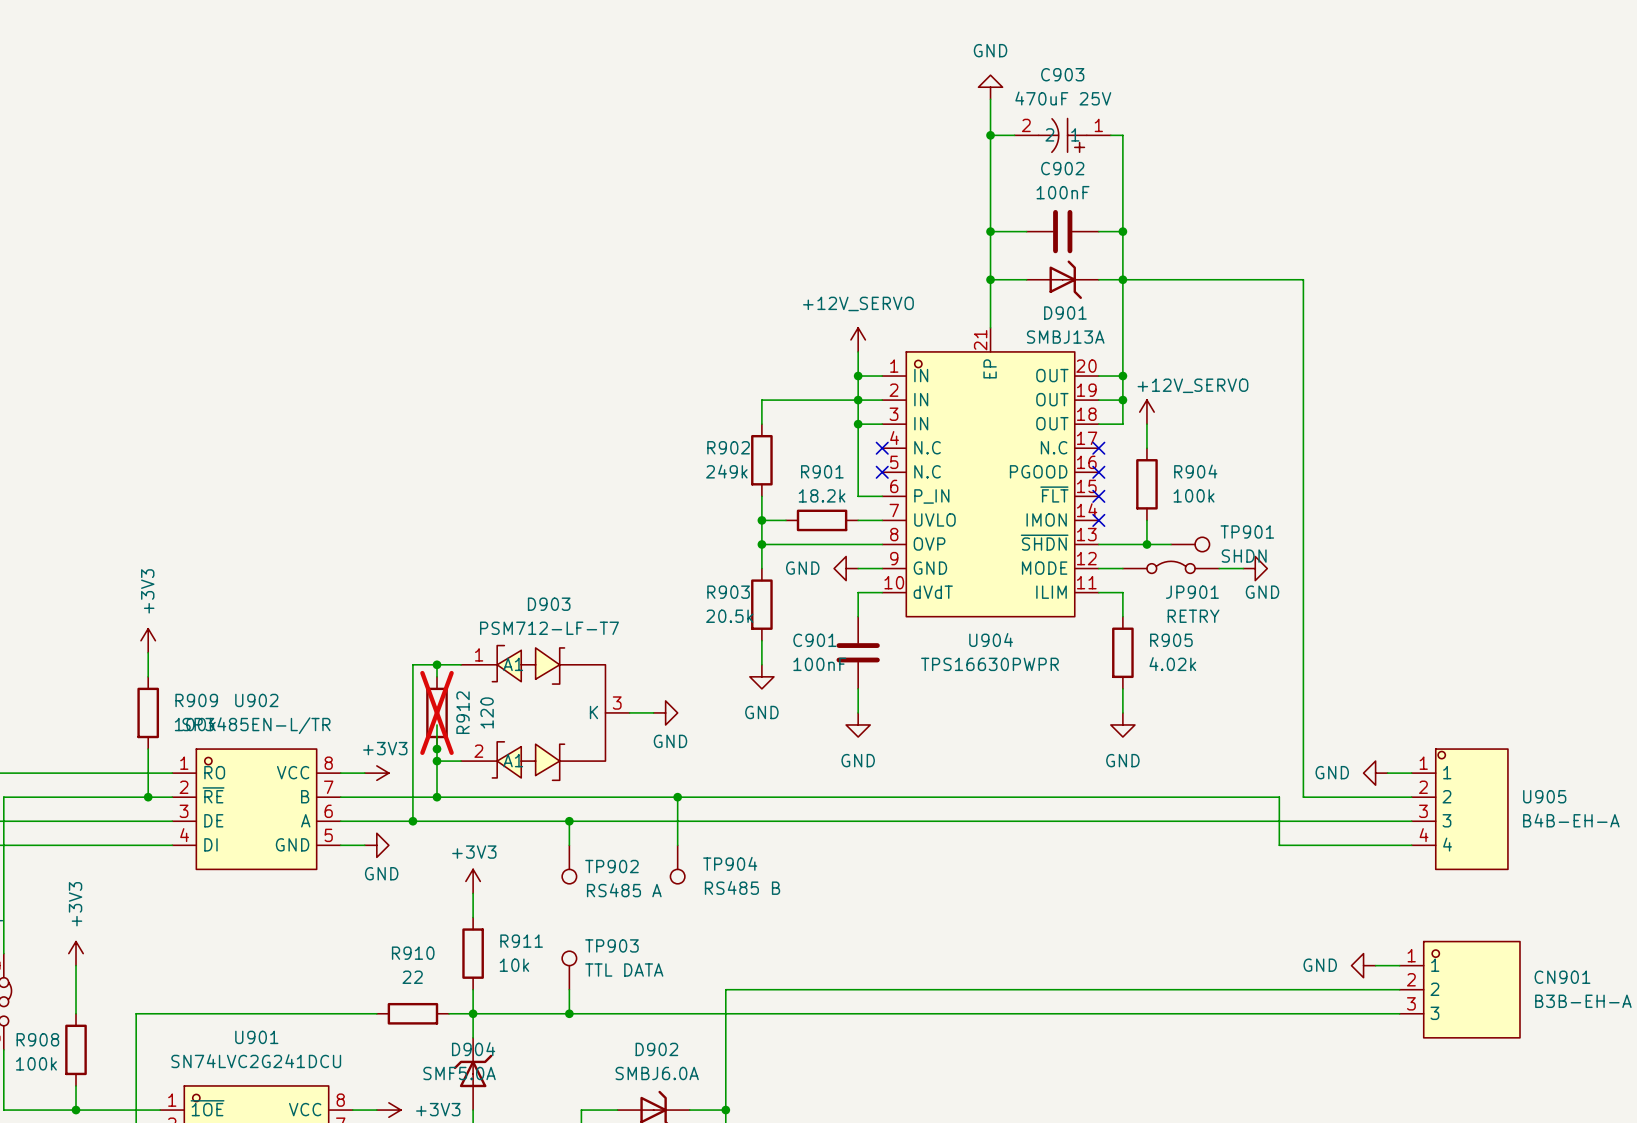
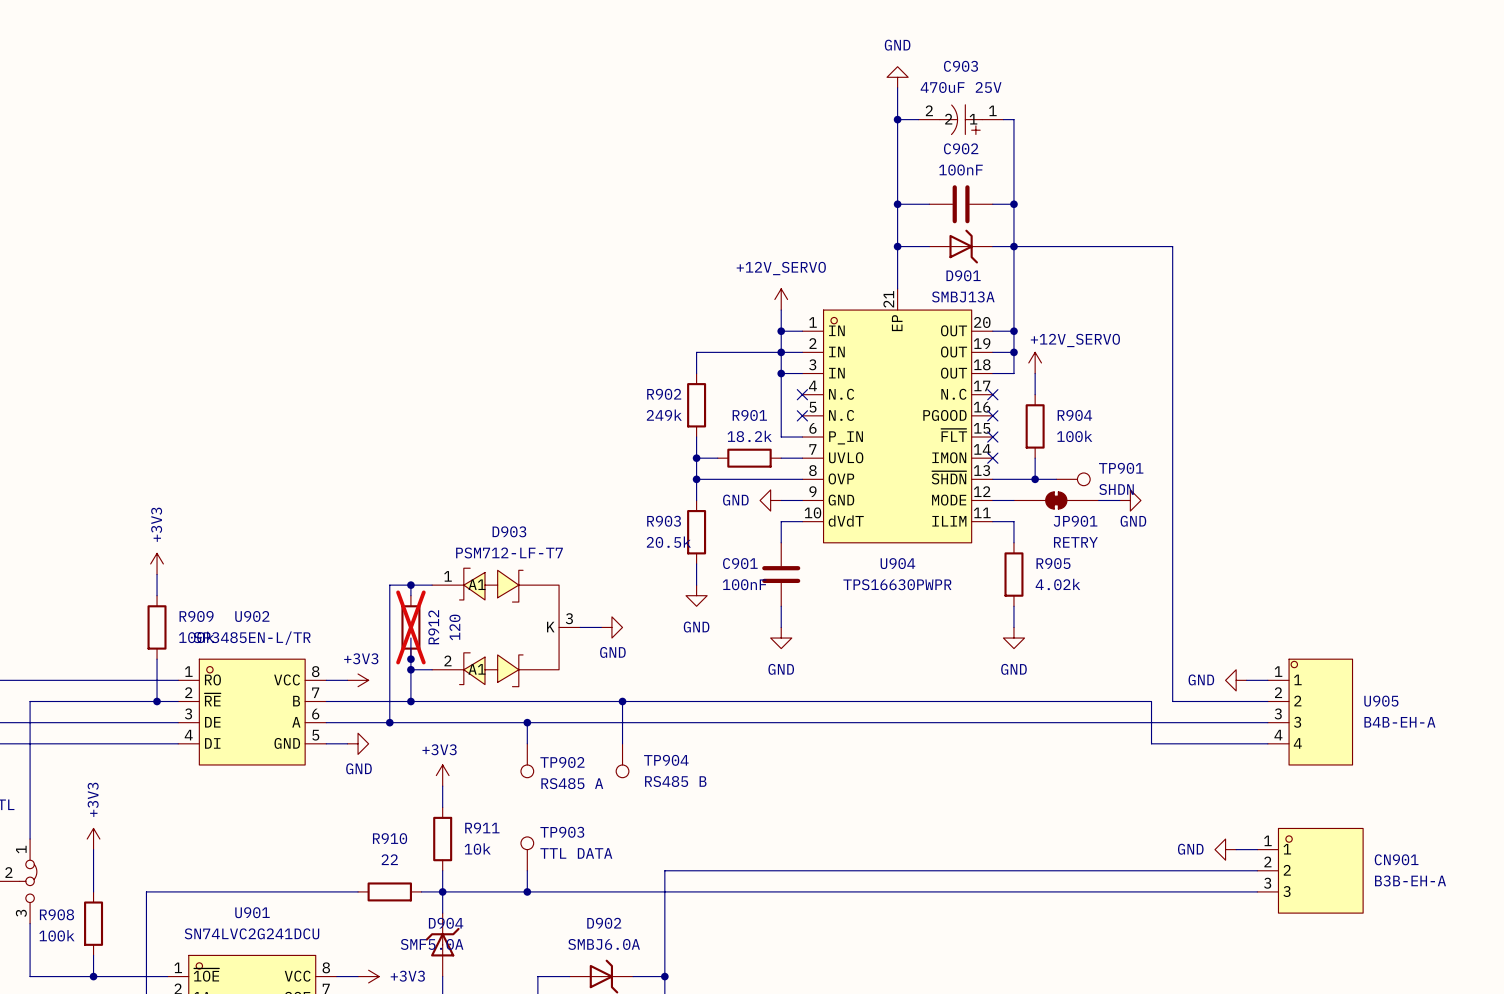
JP901 symbol: [1122, 561, 1220, 574] -> [1013, 491, 1099, 510]

